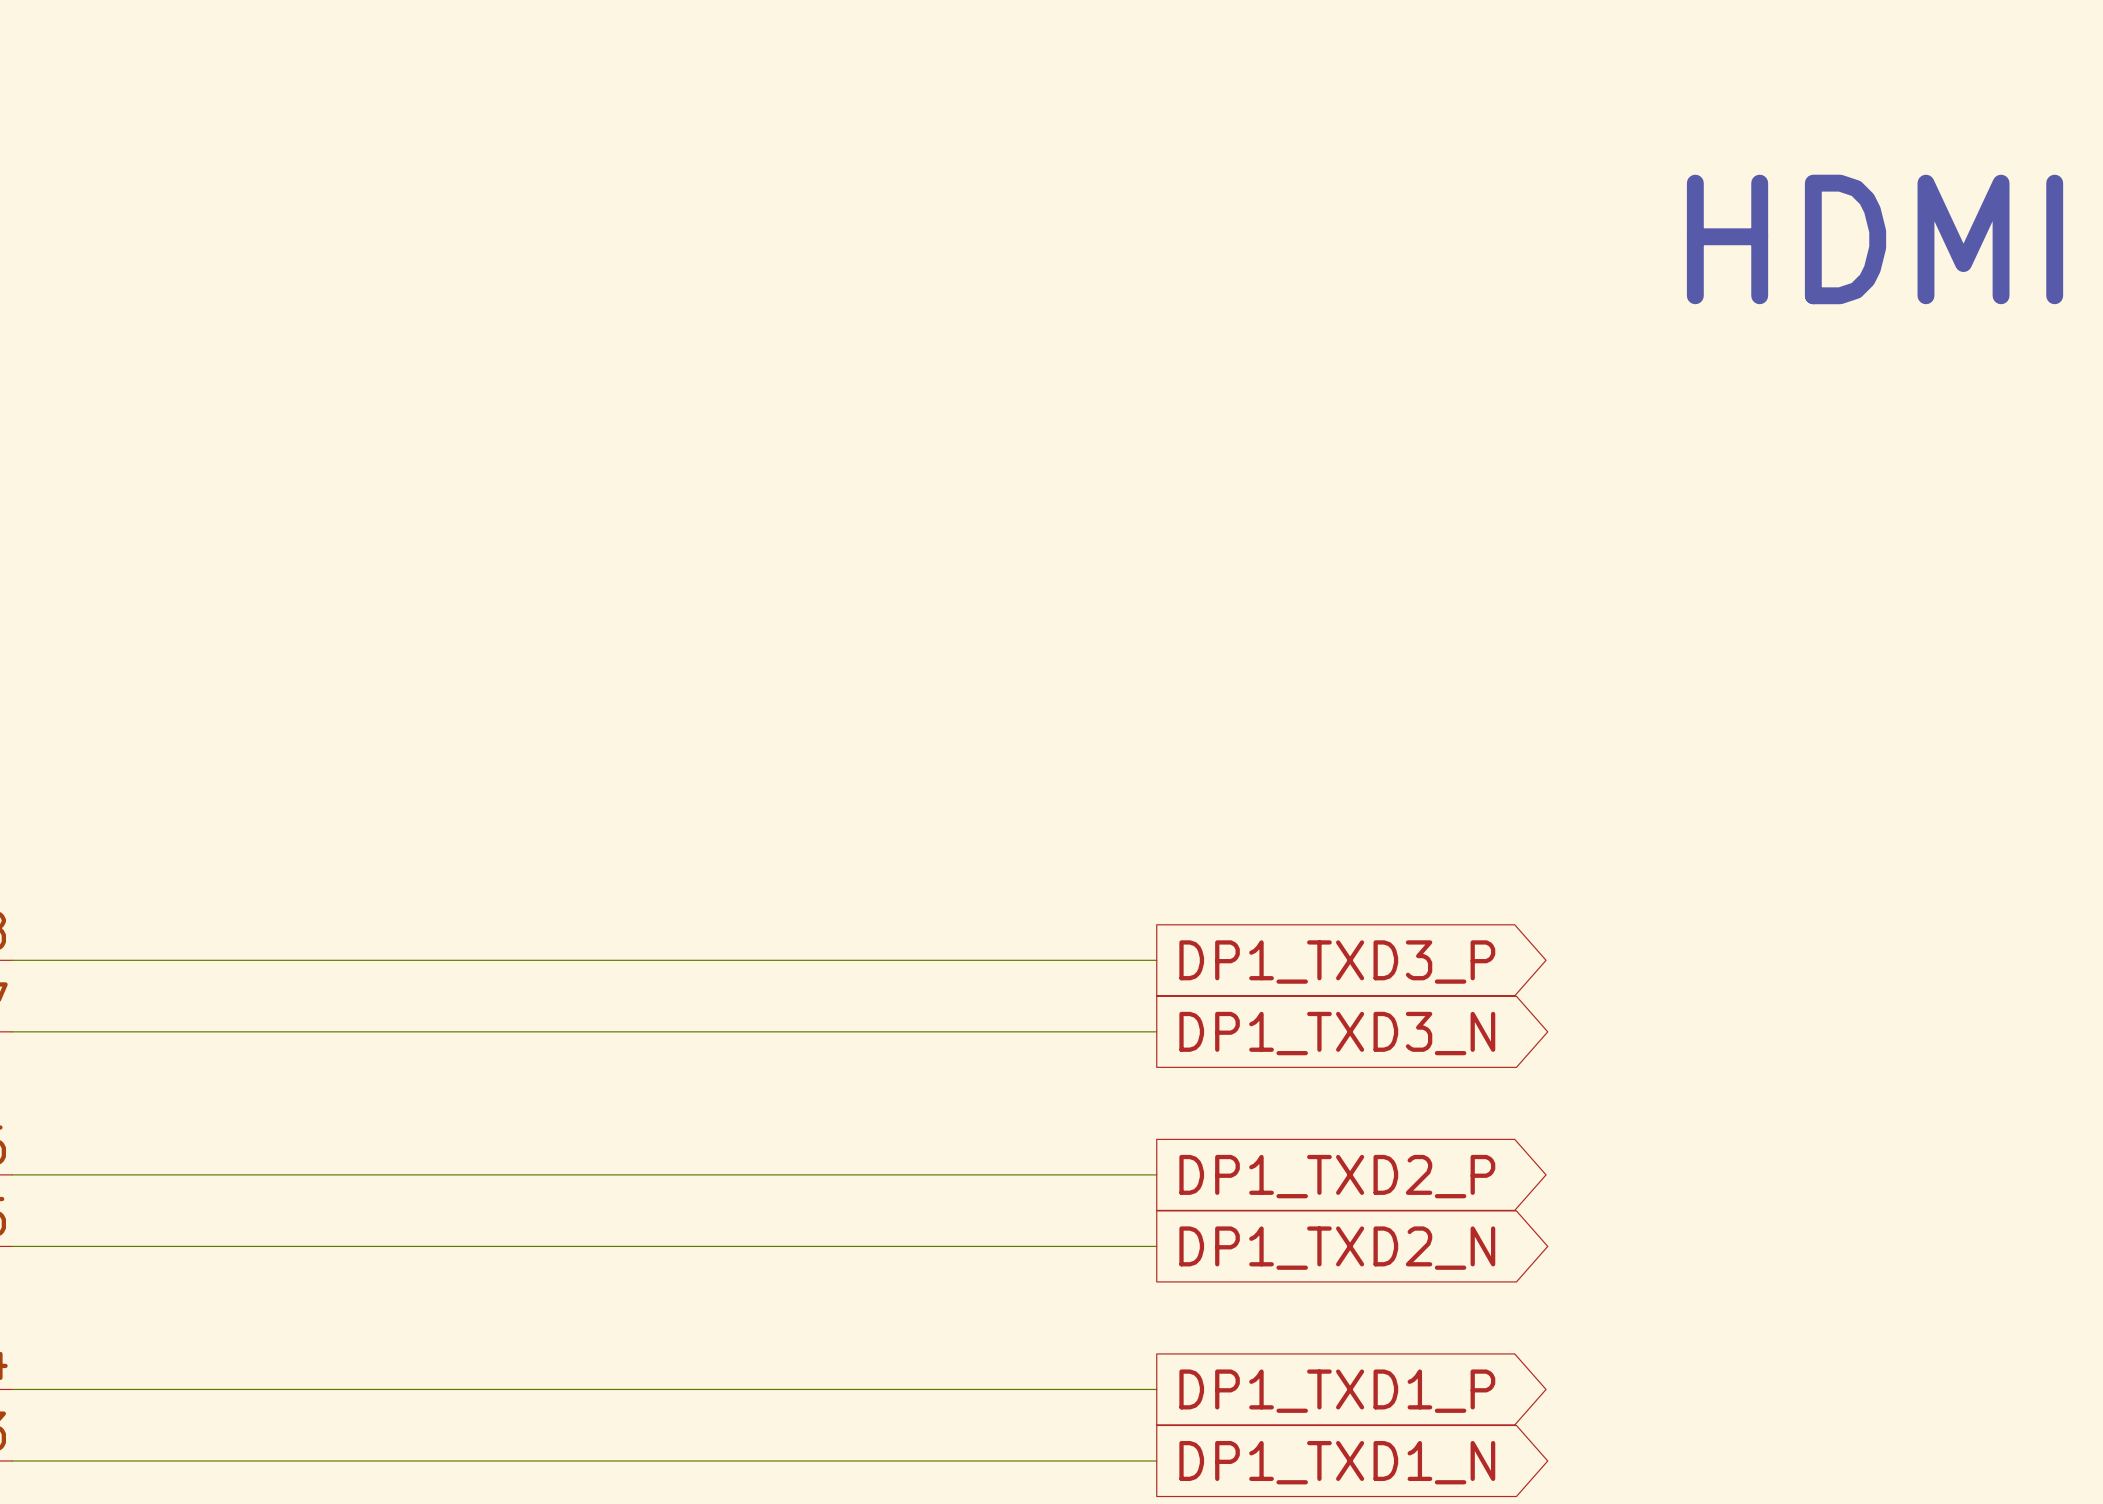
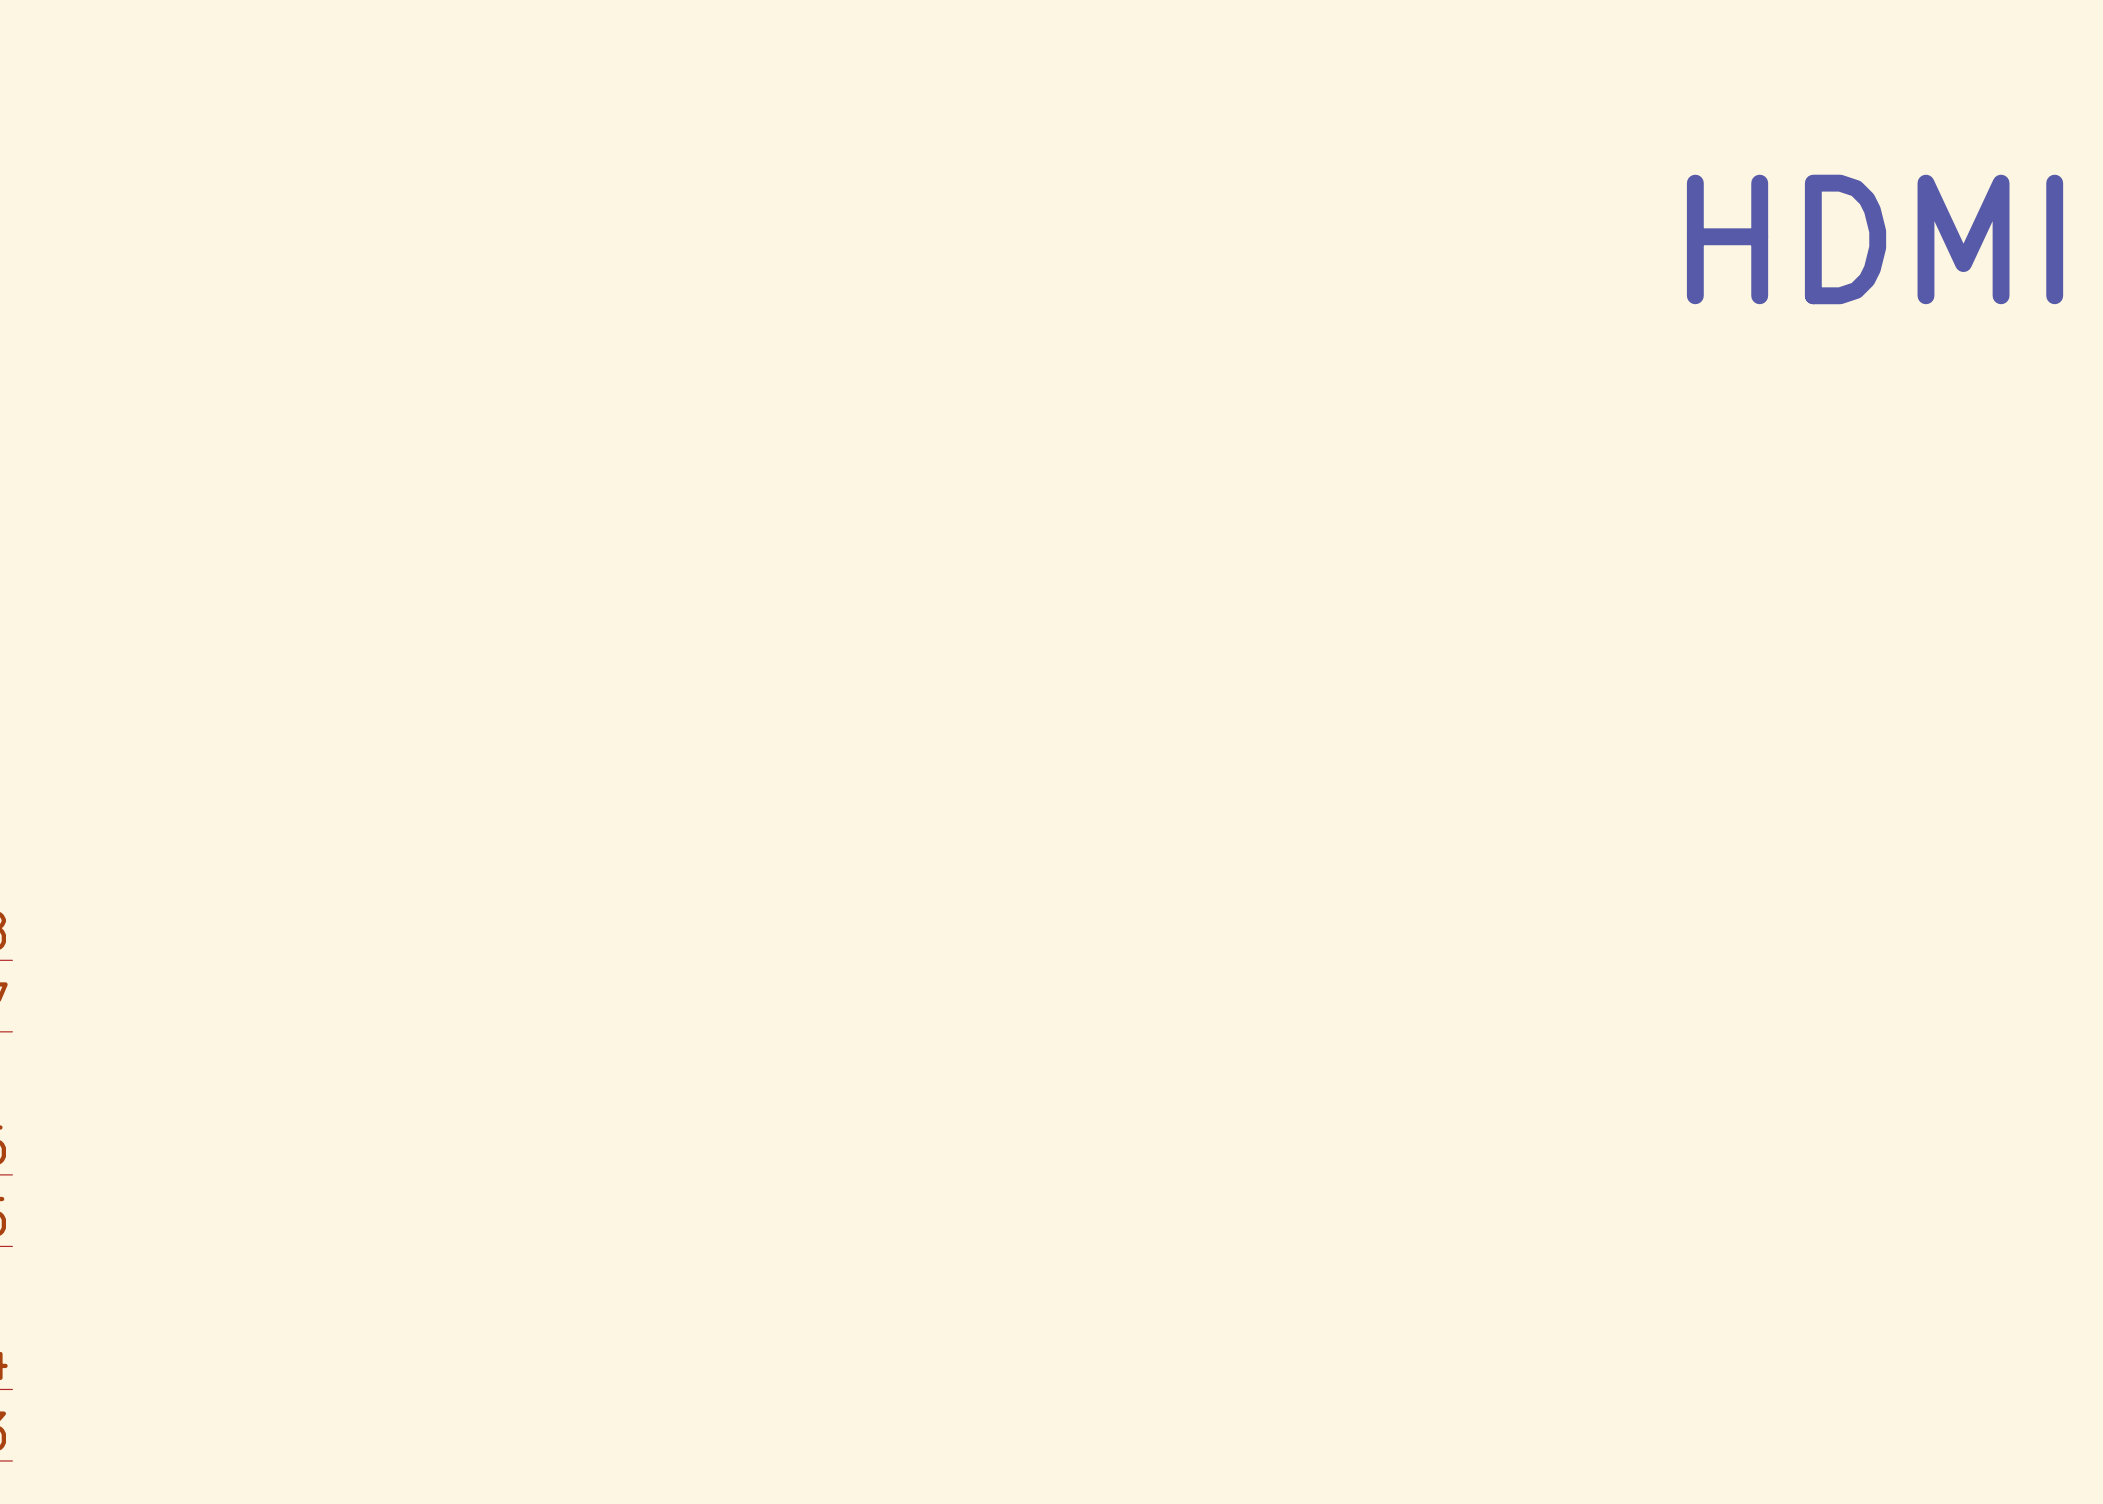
wire: (12, 960) (1156, 960) -> none
global label: DP1_TXD3_P (1337, 962) -> none
wire: (12, 1031) (1156, 1031) -> none
global label: DP1_TXD3_N (1337, 1033) -> none
wire: (12, 1174) (1156, 1174) -> none
global label: DP1_TXD2_P (1337, 1176) -> none
wire: (12, 1246) (1156, 1246) -> none
global label: DP1_TXD2_N (1337, 1248) -> none
wire: (12, 1389) (1156, 1389) -> none
global label: DP1_TXD1_P (1337, 1391) -> none
wire: (12, 1460) (1156, 1460) -> none
global label: DP1_TXD1_N (1337, 1462) -> none

